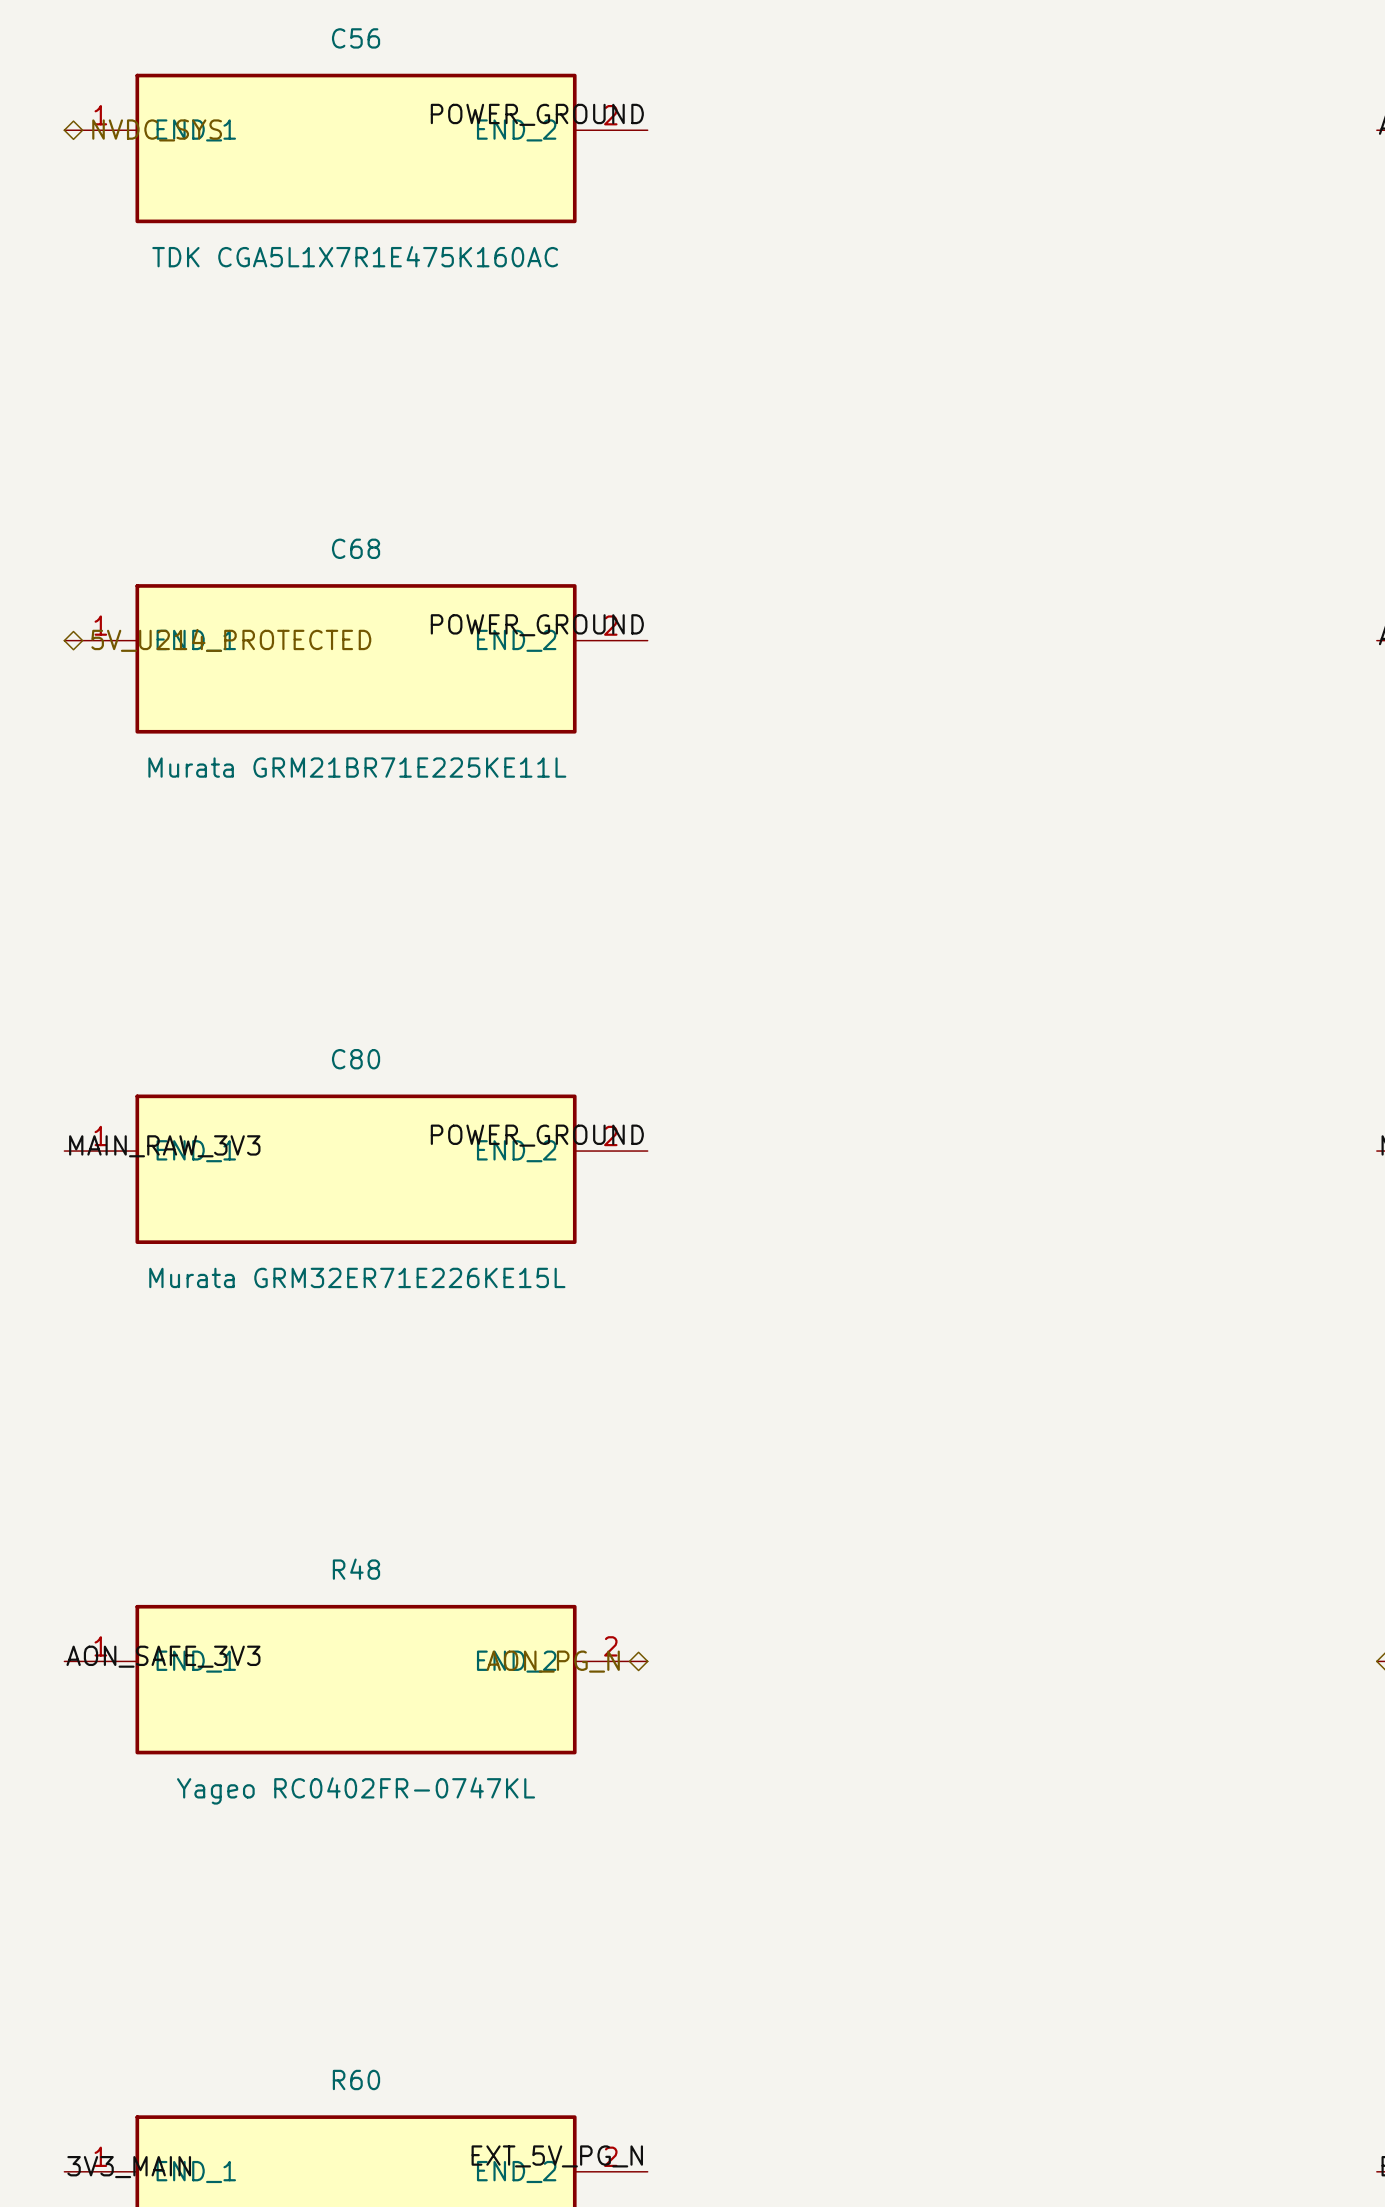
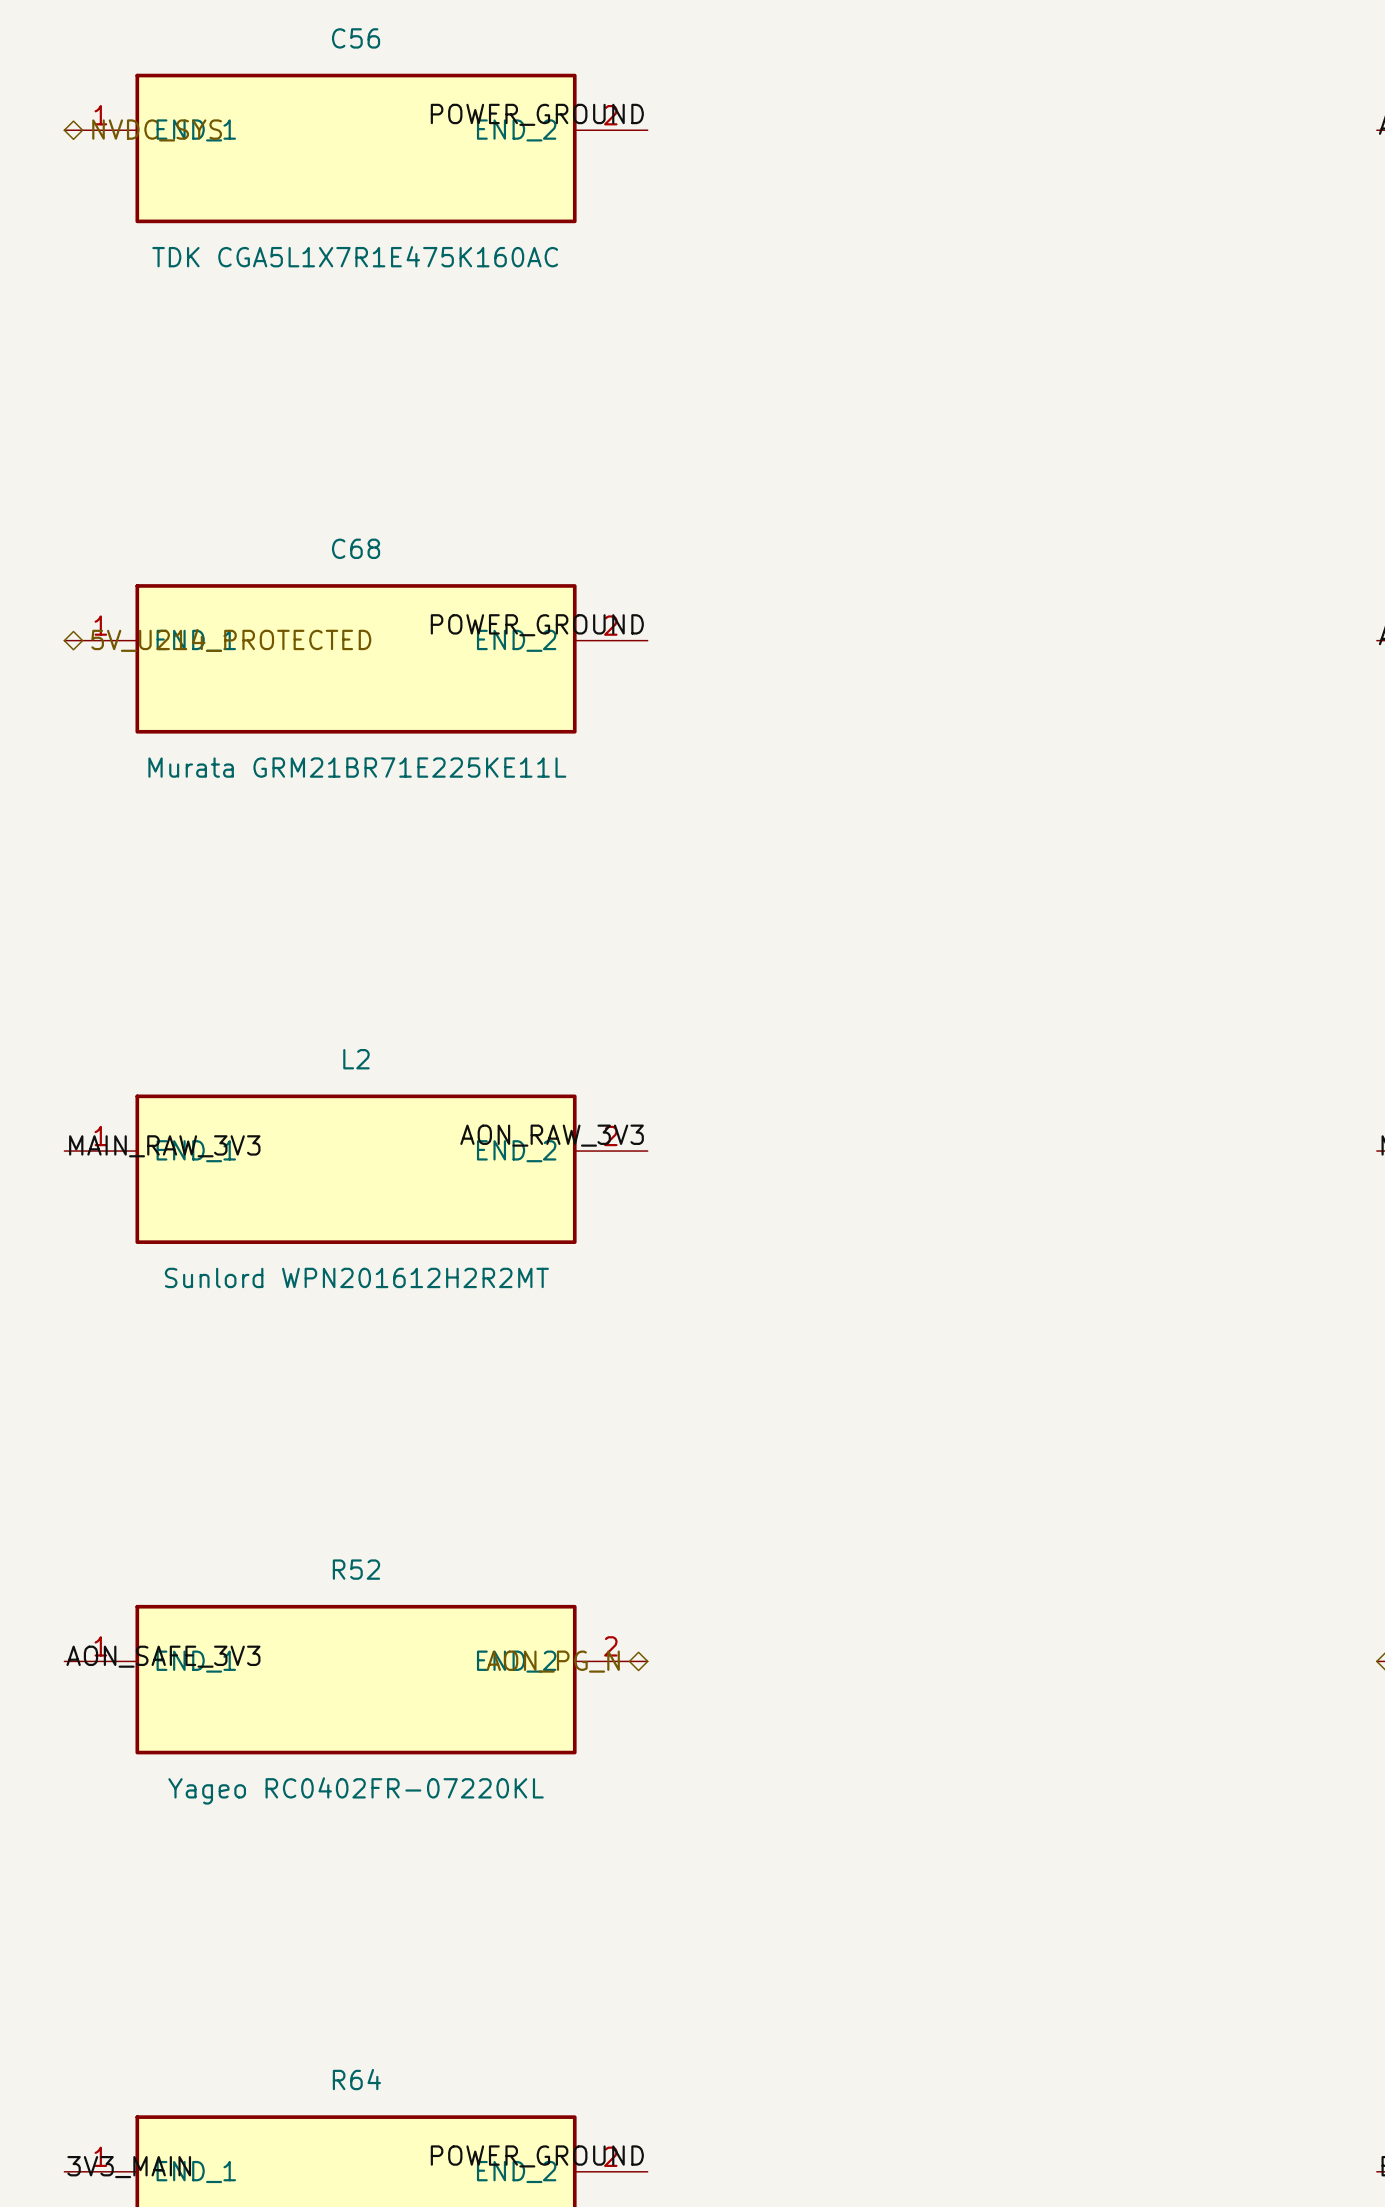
C80 name: C80 (356, 1059) -> L2 (356, 1059)
label: POWER_GROUND (537, 1135) -> AON_RAW_3V3 (552, 1135)
C80 value: Murata GRM32ER71E226KE15L (357, 1277) -> Sunlord WPN201612H2R2MT (356, 1277)
R48 name: R48 (356, 1569) -> R52 (356, 1569)
R48 value: Yageo RC0402FR-0747KL (356, 1790) -> Yageo RC0402FR-07220KL (356, 1790)
R60 name: R60 (356, 2079) -> R64 (356, 2079)
label: EXT_5V_PG_N (557, 2156) -> POWER_GROUND (537, 2156)

